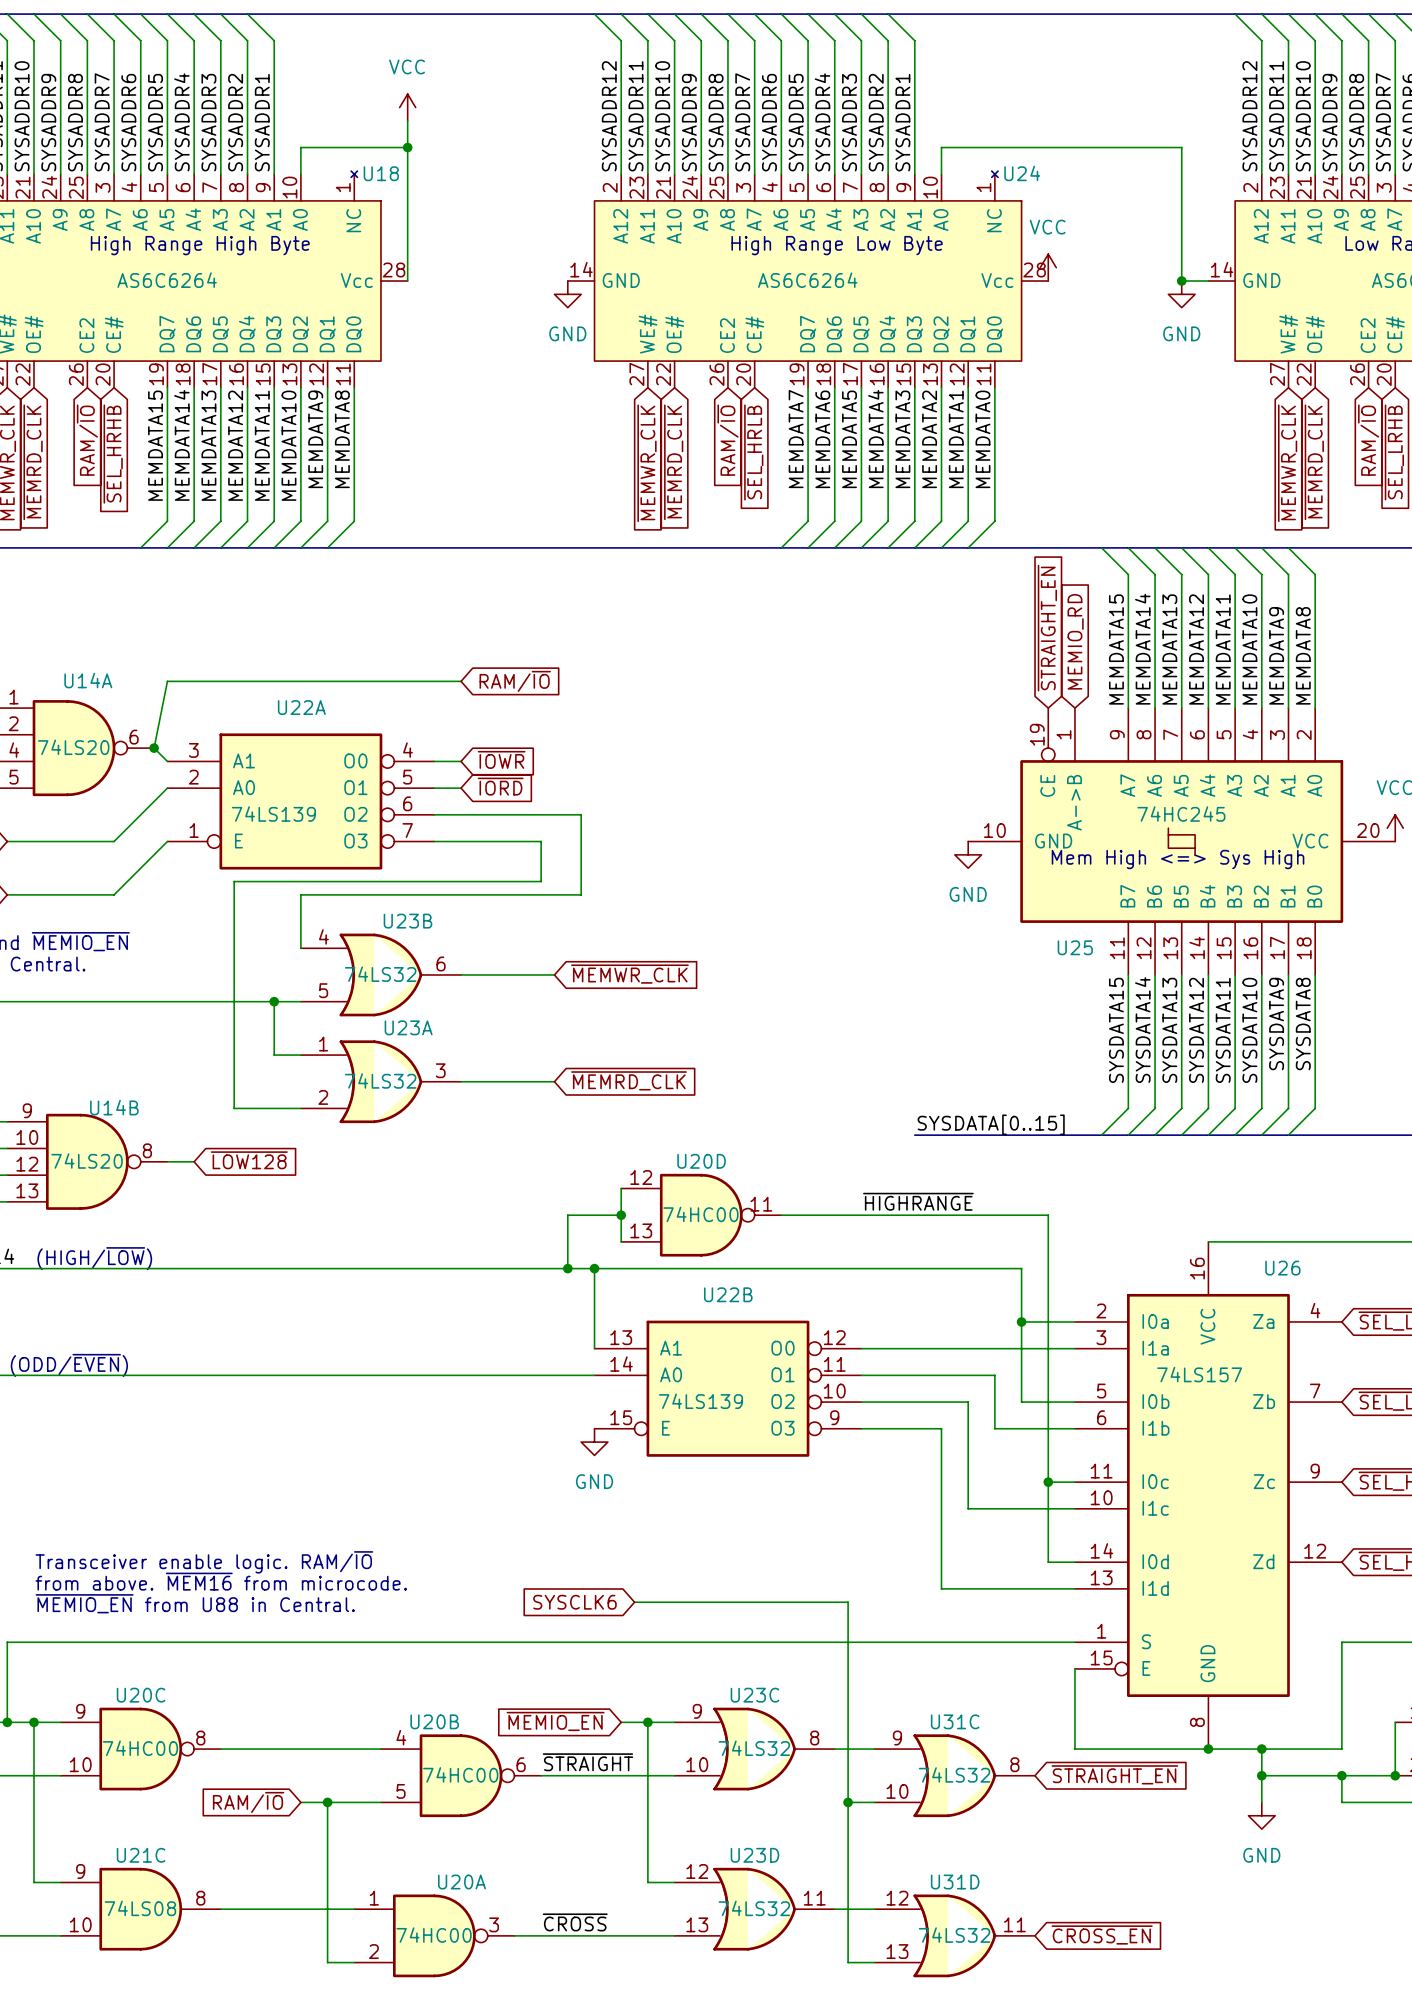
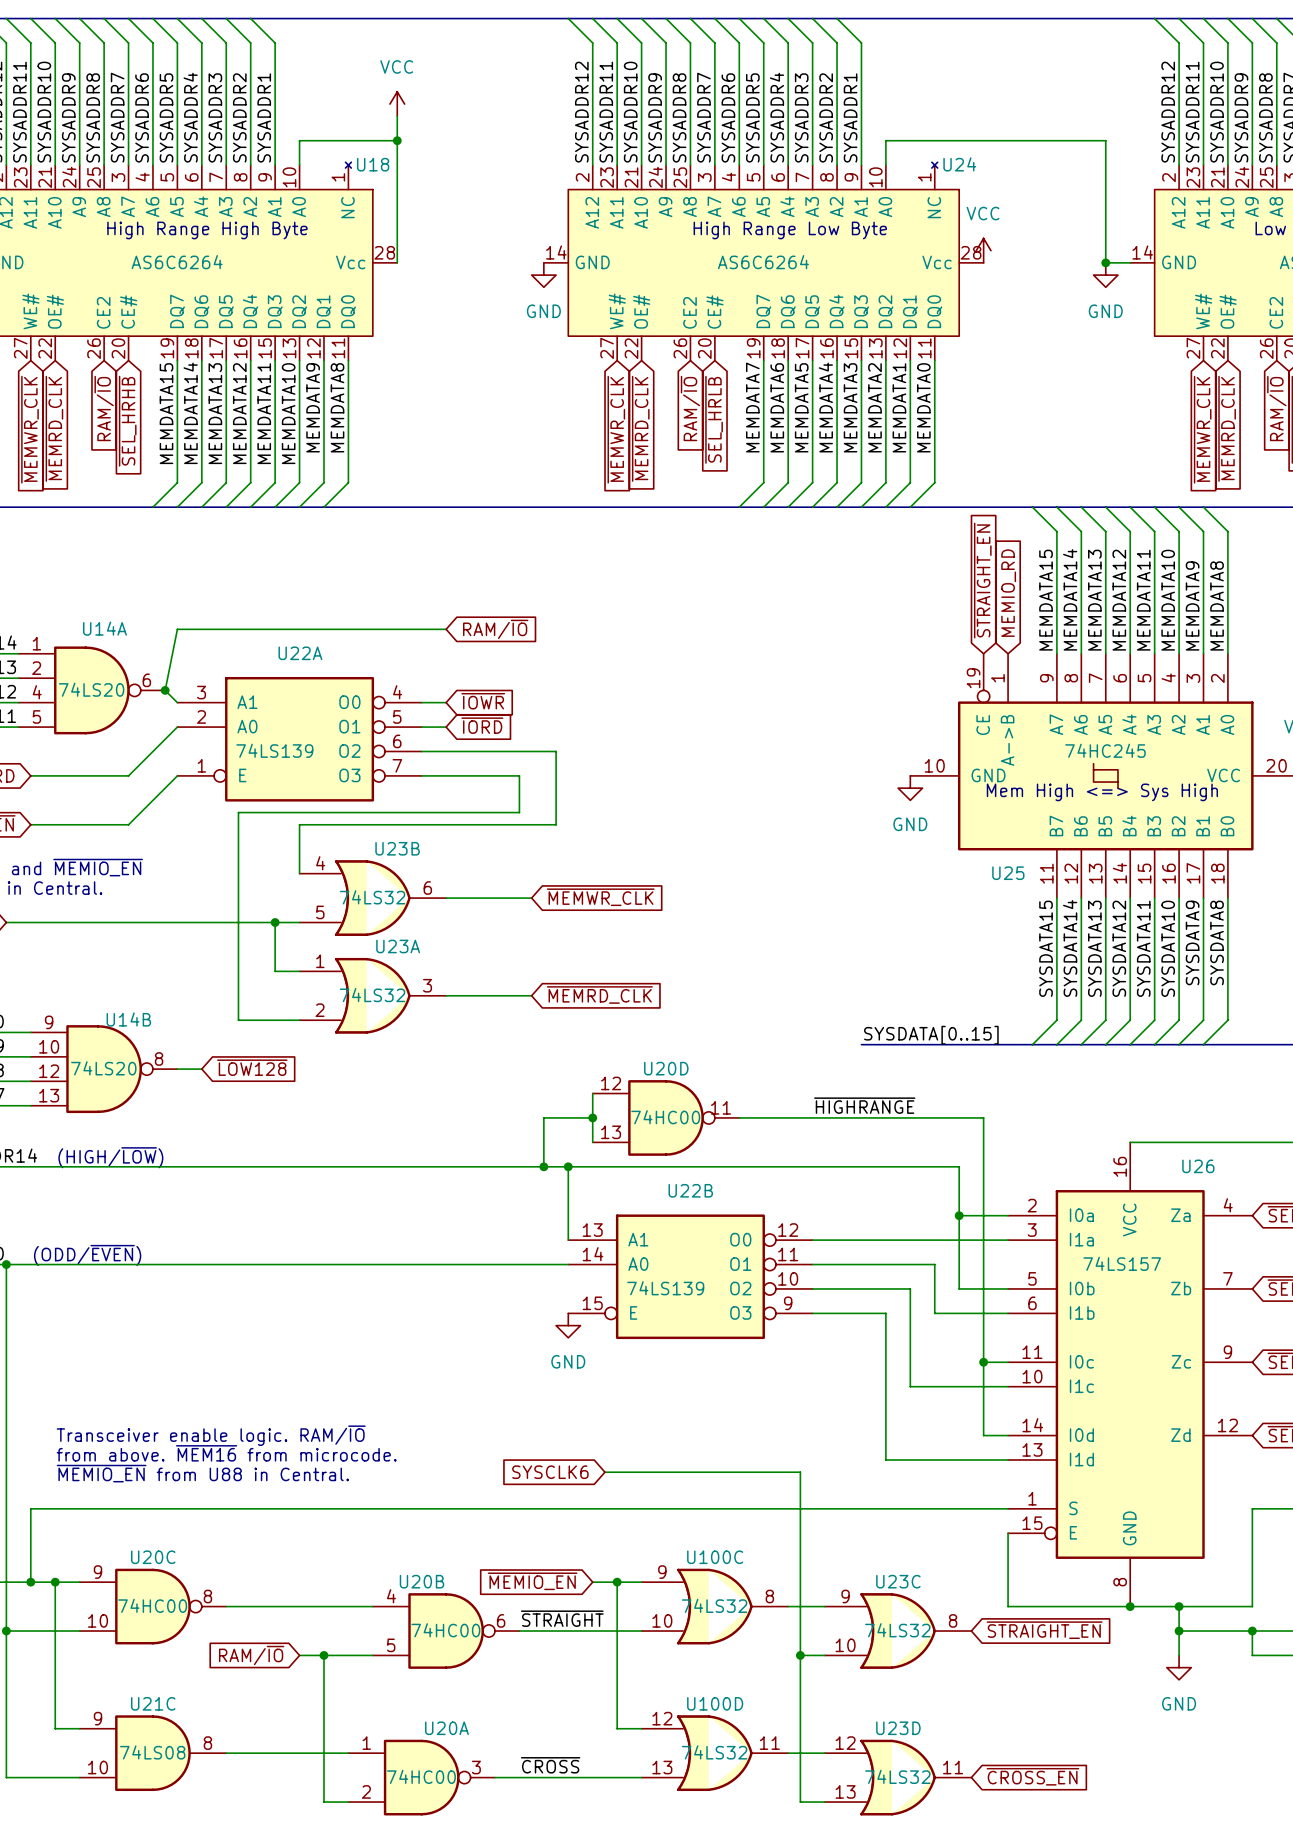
U23C name: U23C (754, 1695) -> U100C (715, 1557)
U31C name: U31C (955, 1721) -> U23C (898, 1581)
U23D name: U23D (754, 1855) -> U100D (715, 1703)
U31D name: U31D (955, 1882) -> U23D (898, 1728)

